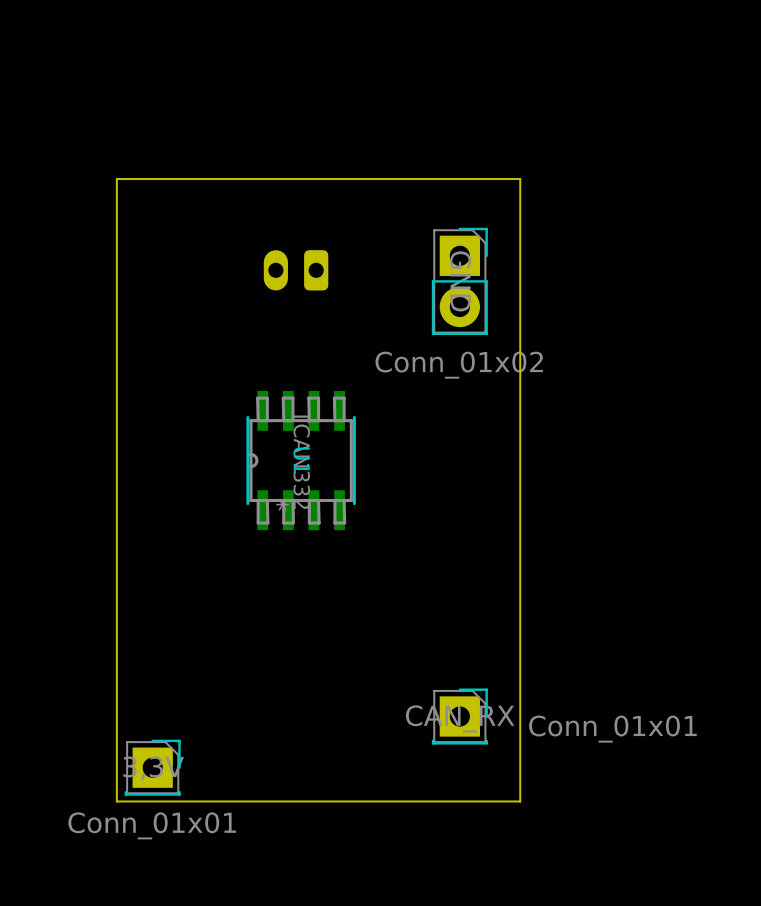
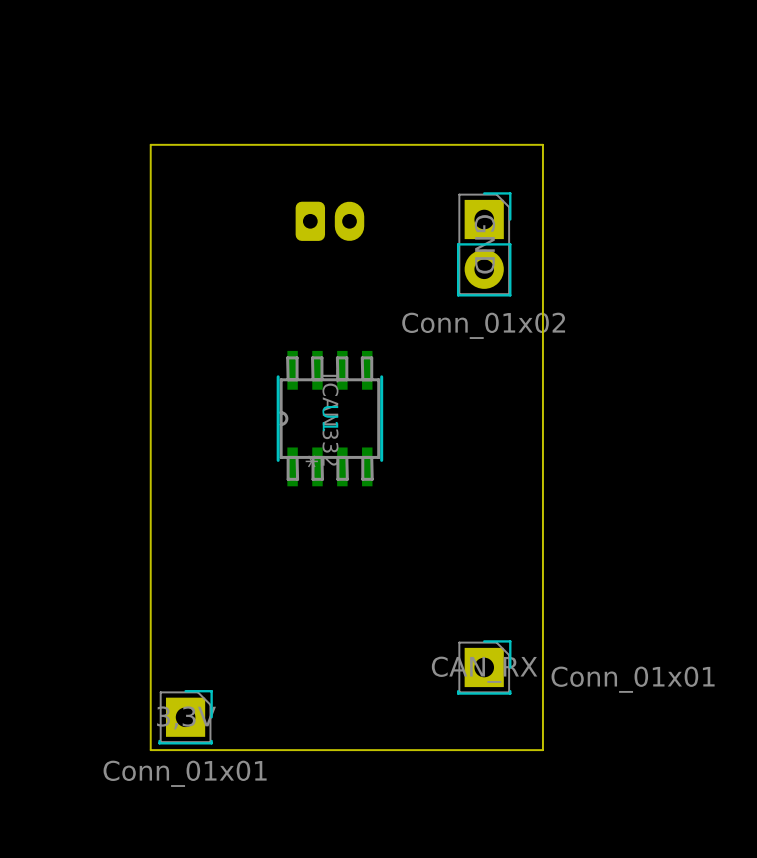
part footprint: [263, 250, 329, 291] -> [295, 201, 365, 241]

